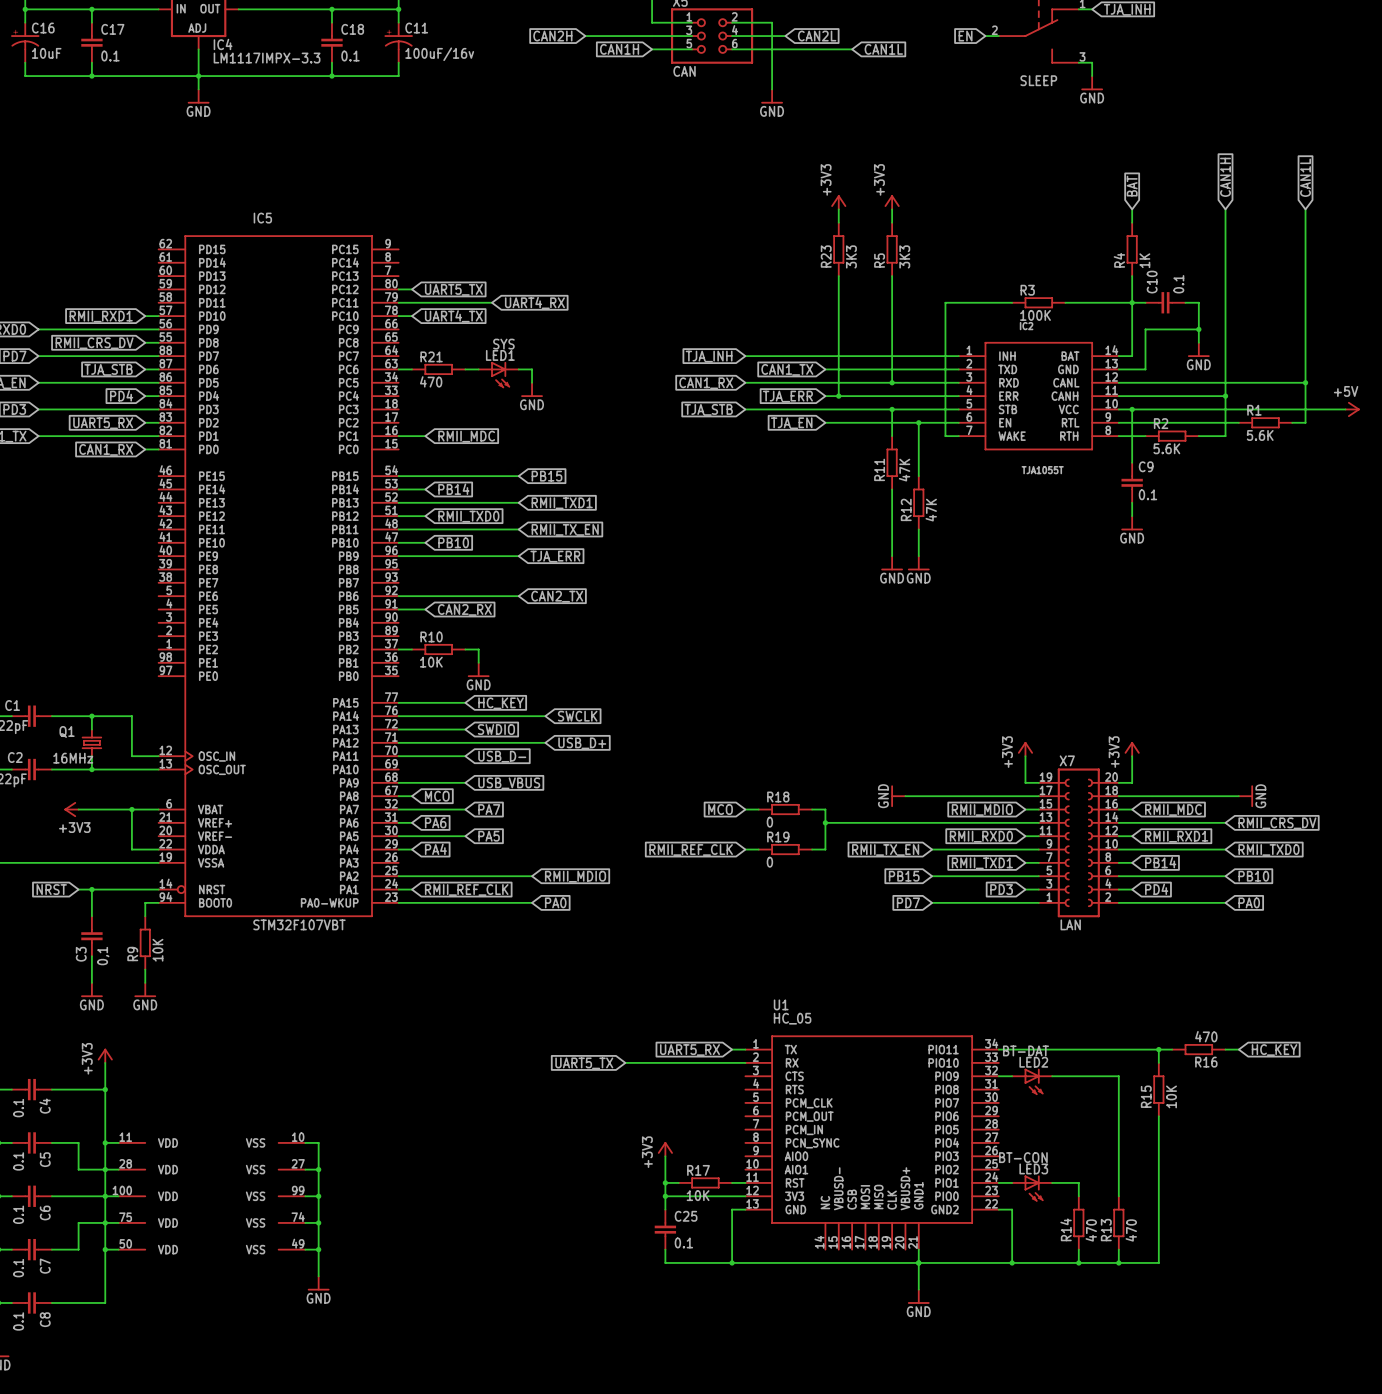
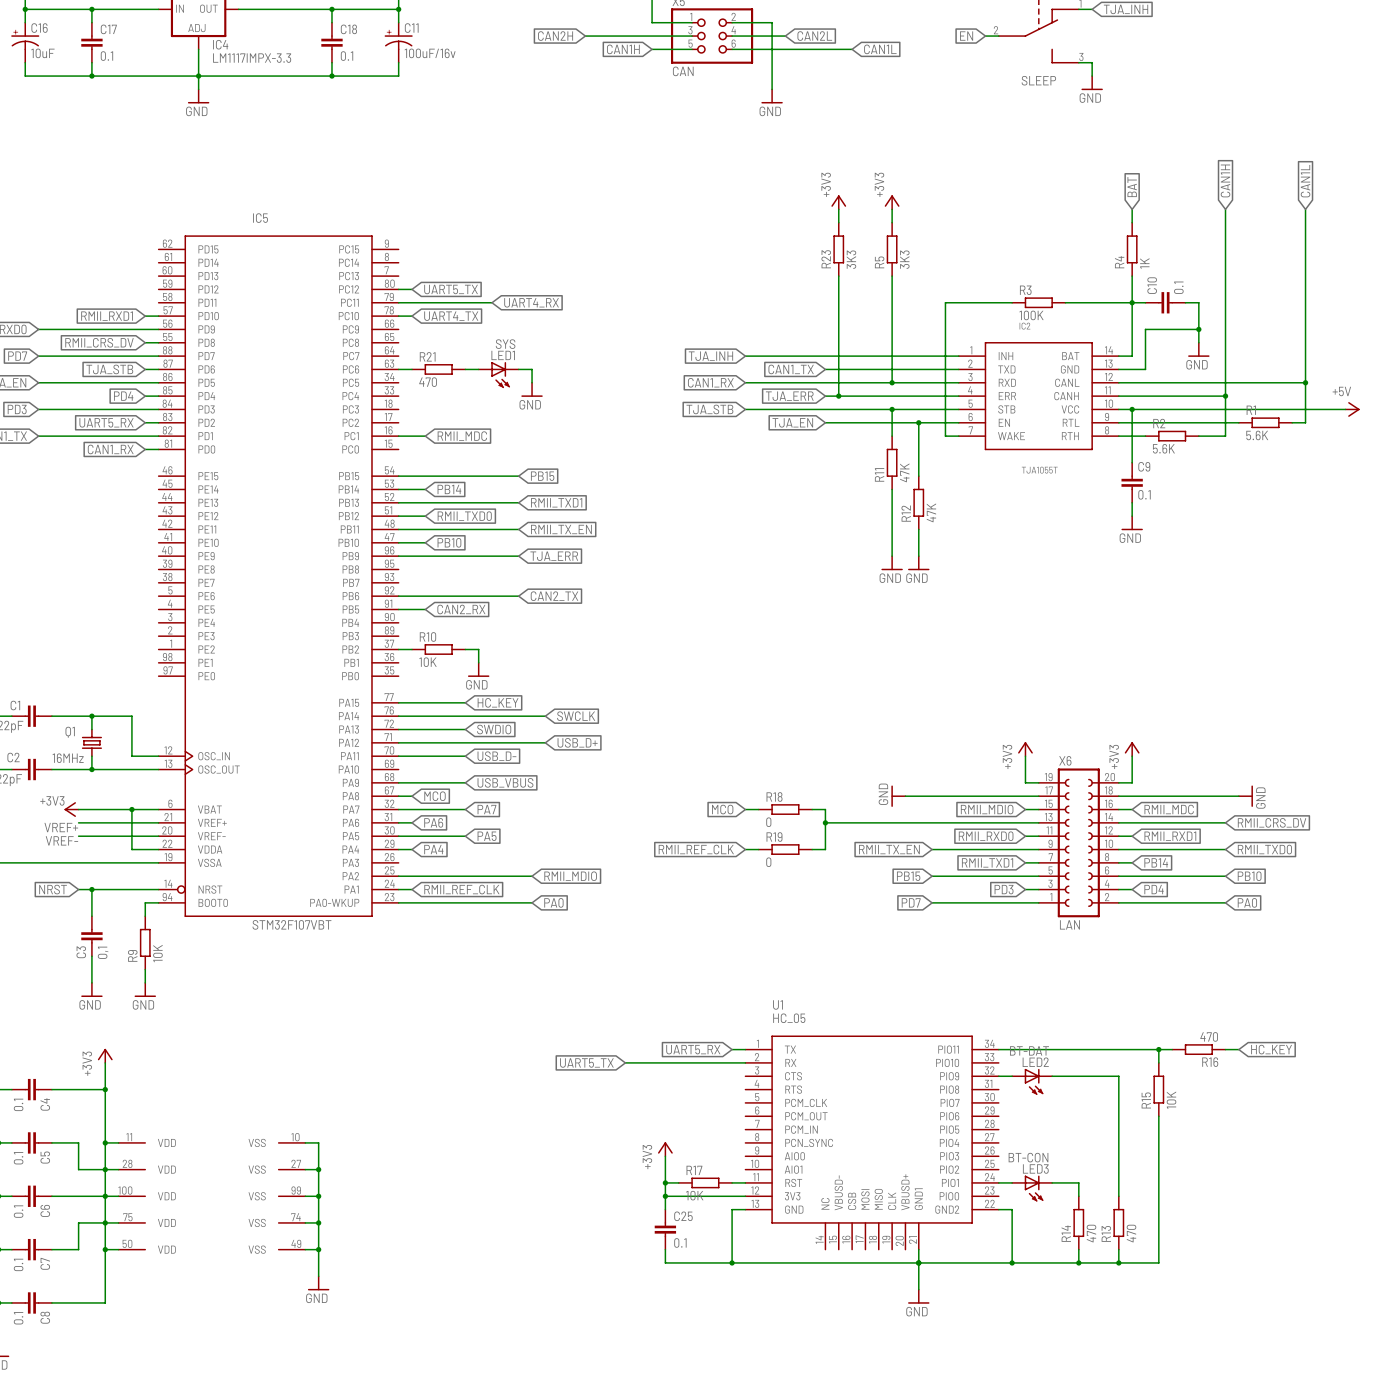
X7 name: X7 (1067, 760) -> X6 (1065, 760)
wire: none -> (78, 822) (158, 822)
label: none -> VREF+ (61, 827)
power symbol text position: +3V3 (74, 827) -> +3V3 (52, 800)
wire: none -> (78, 836) (158, 836)
label: none -> VREF- (61, 840)

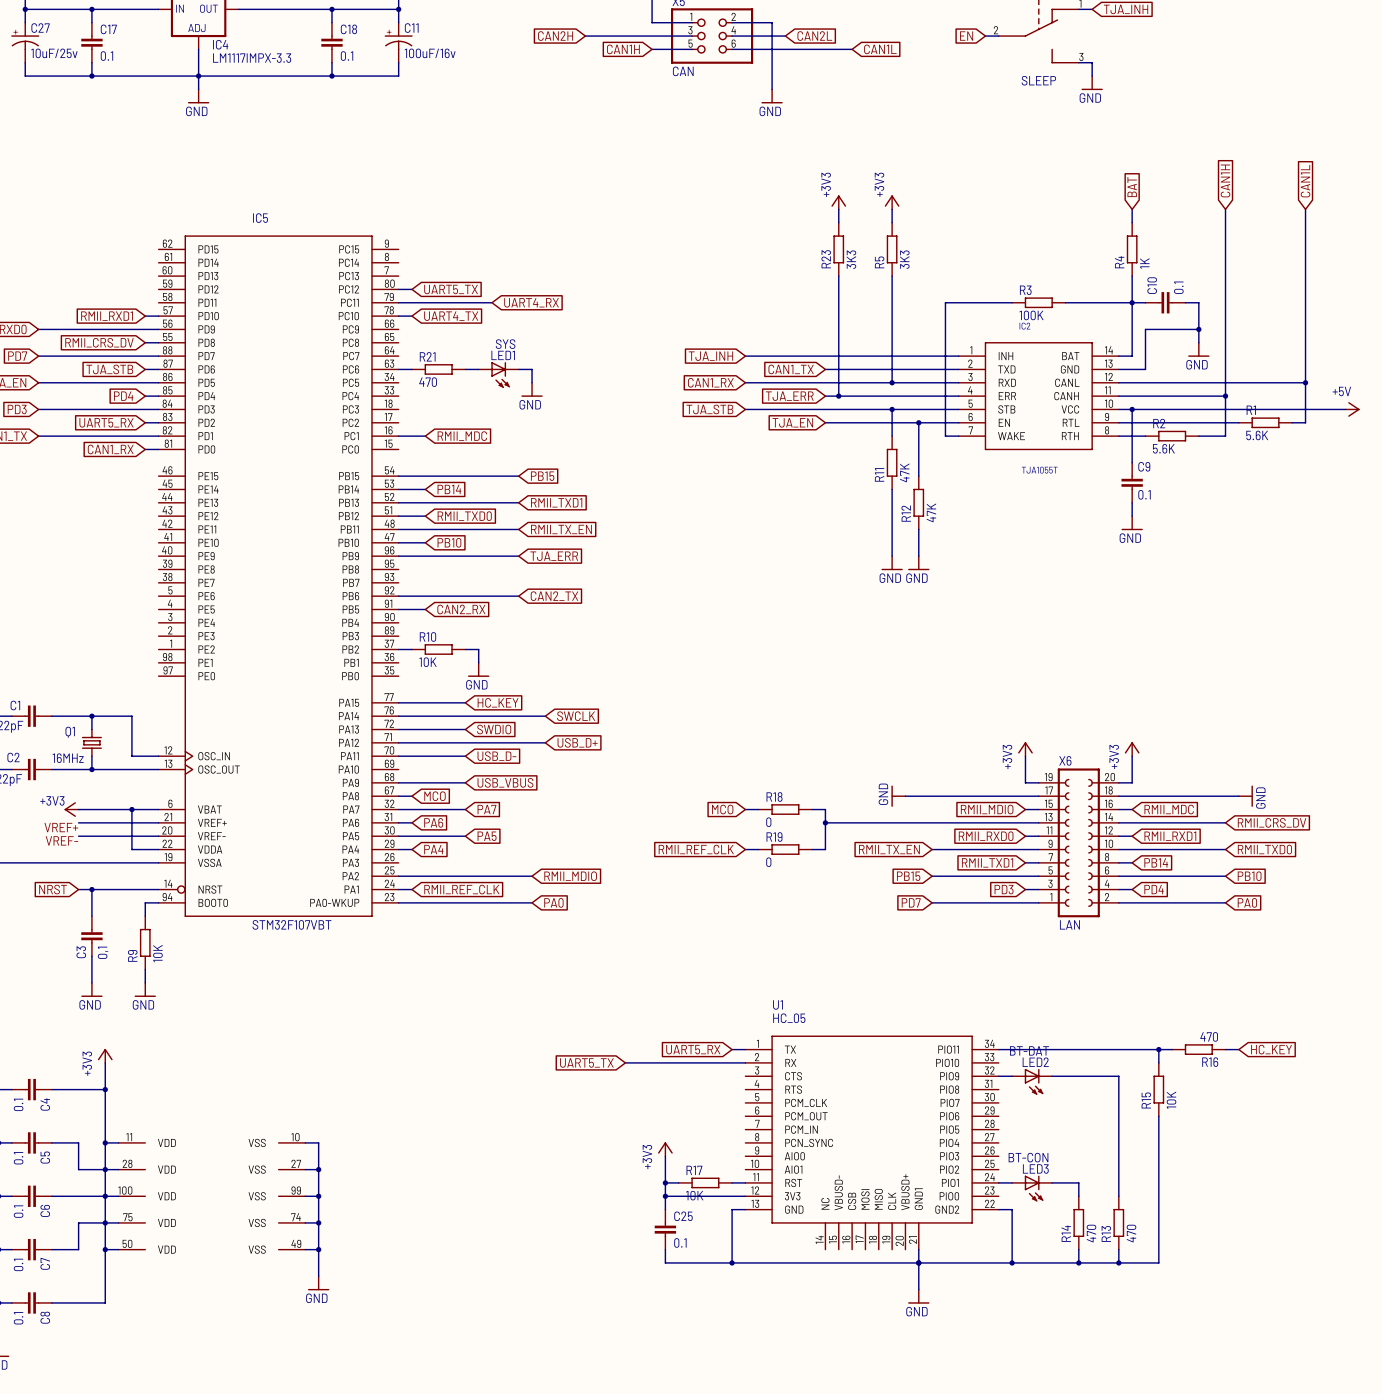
C16 name: C16 (39, 28) -> C27 (40, 28)
C16 value: 10uF (42, 53) -> 10uF/25v (54, 53)

